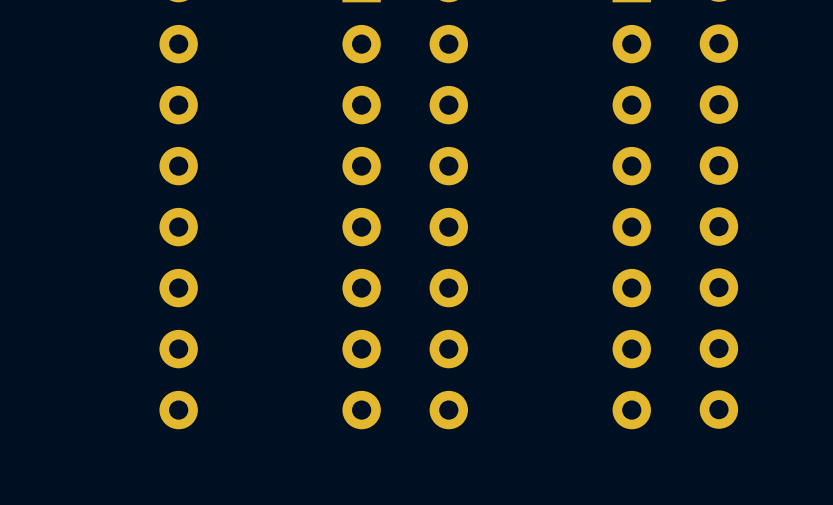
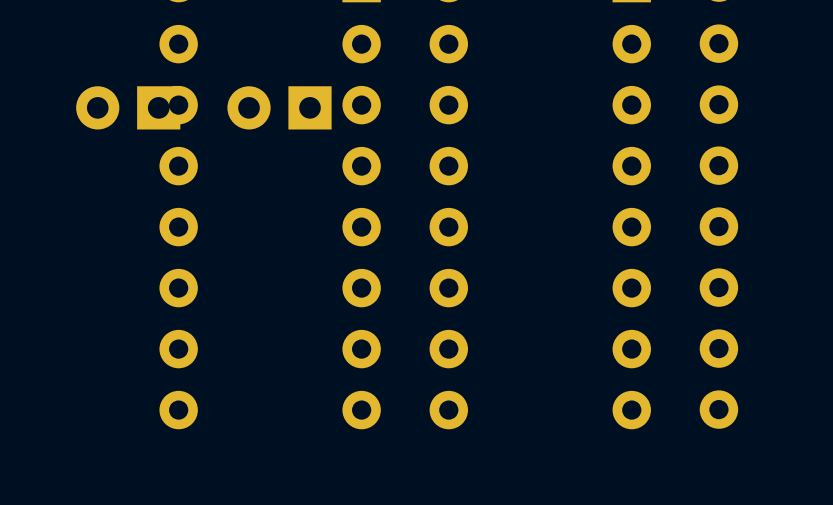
part: none -> (128, 107)
part: none -> (279, 107)

